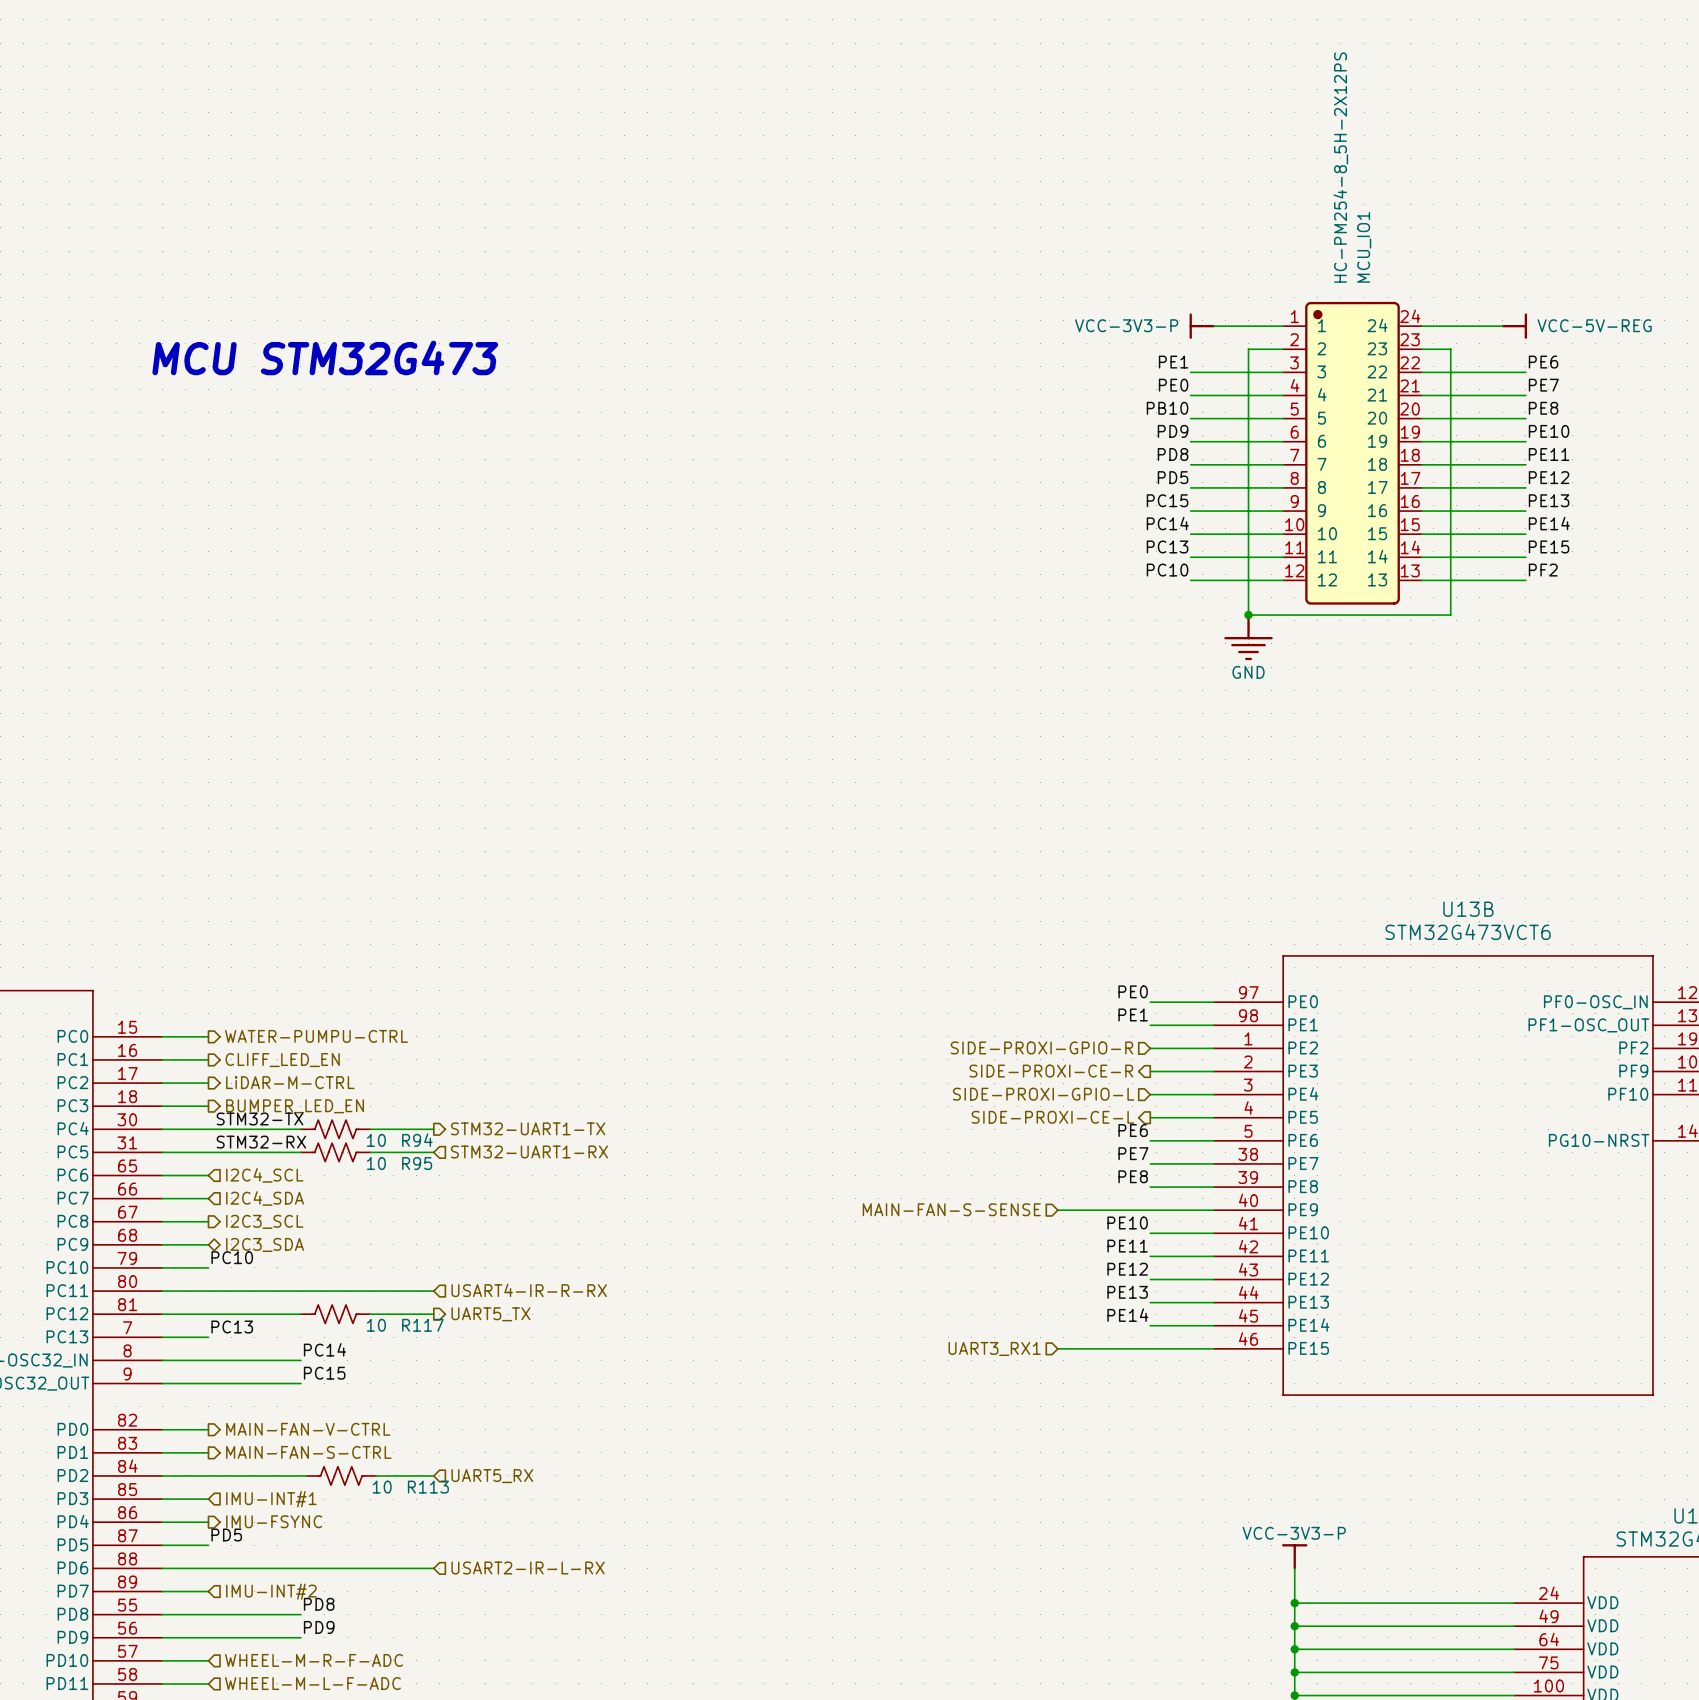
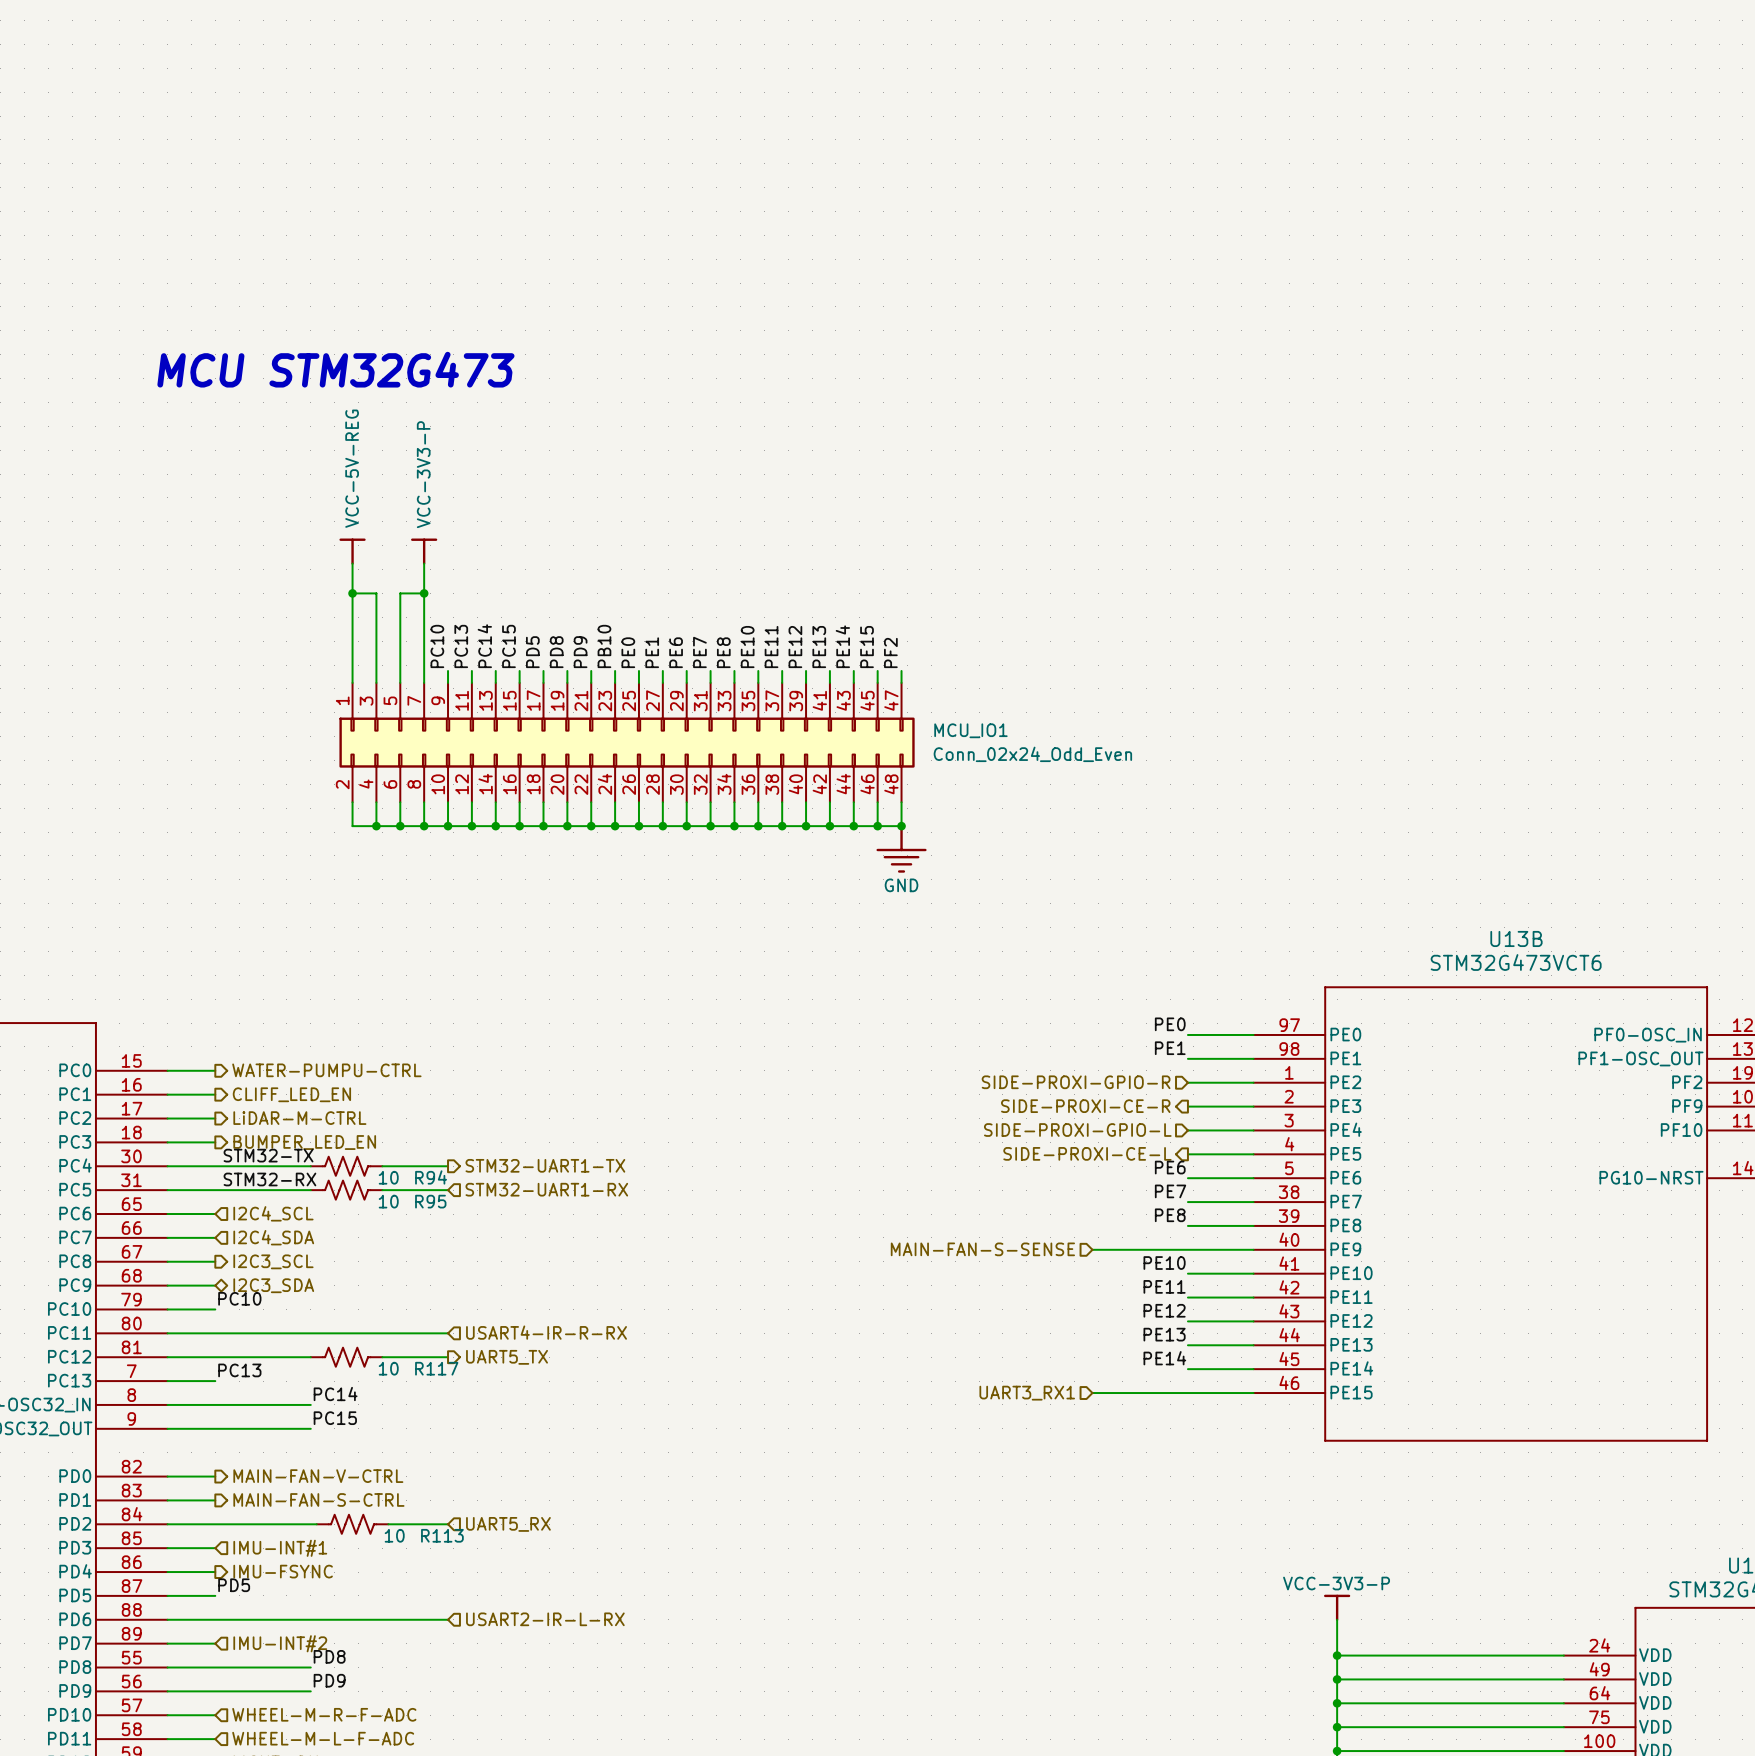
MCU_IO1 value: HC-PM254-8_5H-2X12PS (1340, 167) -> Conn_02x24_Odd_Even (1032, 754)
MCU_IO1 name position: MCU_IO1 (1364, 247) -> MCU_IO1 (970, 730)
MCU_IO1 symbol: [1283, 301, 1422, 605] -> [339, 682, 915, 803]
power symbol: VCC-3V3-P (1202, 326) -> none
wire: (1213, 326) (1283, 326) -> none
wire: (1421, 326) (1502, 326) -> none
power symbol: VCC-5V-REG (1514, 326) -> none
wire: (1283, 349) (1248, 349) (1248, 615) (1450, 615) (1450, 349) (1421, 349) -> none
label: PE1 (1173, 362) -> none
label: PE6 (1543, 362) -> none
wire: (1190, 372) (1283, 372) -> none
wire: (1421, 372) (1525, 372) -> none
label: PE0 (1173, 385) -> none
label: PE7 (1543, 385) -> none
wire: (1190, 395) (1283, 395) -> none
wire: (1421, 395) (1525, 395) -> none
label: PB10 (1167, 408) -> none
label: PE8 (1543, 408) -> none
wire: (1190, 418) (1283, 418) -> none
wire: (1421, 418) (1525, 418) -> none
label: PD9 (1173, 431) -> none
label: PE10 (1549, 431) -> none
wire: (1190, 441) (1283, 441) -> none
wire: (1421, 441) (1525, 441) -> none
label: PD8 (1173, 454) -> none
label: PE11 (1549, 454) -> none
wire: (1190, 464) (1283, 464) -> none
wire: (1421, 464) (1525, 464) -> none
label: PD5 (1173, 477) -> none
label: PE12 (1549, 477) -> none
wire: (1190, 487) (1283, 487) -> none
wire: (1421, 487) (1525, 487) -> none
label: PC15 (1167, 500) -> none
label: PE13 (1549, 500) -> none
wire: (1190, 511) (1283, 511) -> none
wire: (1421, 511) (1525, 511) -> none
label: PC14 (1167, 523) -> none
label: PE14 (1549, 523) -> none
power symbol: none -> VCC-5V-REG (352, 551)
power symbol: none -> VCC-3V3-P (424, 551)
wire: (1190, 534) (1283, 534) -> none
wire: (1421, 534) (1525, 534) -> none
wire: none -> (352, 563) (352, 682)
wire: none -> (424, 563) (424, 682)
label: PC13 (1167, 546) -> none
label: PE15 (1549, 546) -> none
wire: (1190, 557) (1283, 557) -> none
wire: (1421, 557) (1525, 557) -> none
label: PC10 (1167, 570) -> none
label: PF2 (1543, 570) -> none
wire: none -> (352, 593) (376, 593) (376, 682)
junction: none -> (352, 593)
wire: none -> (424, 593) (400, 593) (400, 682)
junction: none -> (424, 593)
wire: (1190, 580) (1283, 580) -> none
wire: (1421, 580) (1525, 580) -> none
junction: (1248, 615) -> none
label: none -> PC10 (437, 646)
label: none -> PC13 (461, 646)
label: none -> PC14 (484, 646)
label: none -> PC15 (508, 646)
label: none -> PB10 (604, 646)
label: none -> PE10 (747, 647)
label: none -> PE11 (771, 647)
label: none -> PE12 (795, 647)
label: none -> PE13 (819, 647)
label: none -> PE14 (842, 646)
label: none -> PE15 (867, 647)
label: none -> PD5 (532, 652)
label: none -> PD8 (556, 652)
label: none -> PD9 (580, 652)
label: none -> PE7 (699, 652)
label: none -> PE0 (628, 652)
label: none -> PE1 (652, 652)
label: none -> PE6 (676, 652)
label: none -> PE8 (723, 652)
label: none -> PF2 (890, 653)
power symbol: GND (1248, 637) -> none
wire: none -> (448, 670) (448, 682)
wire: none -> (471, 670) (471, 682)
wire: none -> (495, 670) (495, 682)
wire: none -> (519, 670) (519, 682)
wire: none -> (543, 670) (543, 682)
wire: none -> (567, 670) (567, 682)
wire: none -> (591, 670) (591, 682)
wire: none -> (615, 670) (615, 682)
wire: none -> (638, 670) (638, 682)
wire: none -> (662, 670) (662, 682)
wire: none -> (686, 670) (686, 682)
wire: none -> (710, 670) (710, 682)
wire: none -> (734, 670) (734, 682)
wire: none -> (758, 670) (758, 682)
wire: none -> (782, 670) (782, 682)
wire: none -> (806, 670) (806, 682)
wire: none -> (829, 670) (829, 682)
wire: none -> (853, 670) (853, 682)
wire: none -> (877, 670) (877, 682)
wire: none -> (901, 670) (901, 682)
wire: none -> (352, 802) (352, 826) (901, 826) (901, 802)
wire: none -> (376, 802) (376, 826)
wire: none -> (400, 802) (400, 826)
wire: none -> (424, 802) (424, 826)
wire: none -> (448, 802) (448, 826)
wire: none -> (471, 802) (471, 826)
wire: none -> (495, 802) (495, 826)
wire: none -> (519, 802) (519, 826)
wire: none -> (543, 802) (543, 826)
wire: none -> (567, 802) (567, 826)
wire: none -> (591, 802) (591, 826)
wire: none -> (615, 802) (615, 826)
wire: none -> (638, 802) (638, 826)
wire: none -> (662, 802) (662, 826)
wire: none -> (686, 802) (686, 826)
wire: none -> (710, 802) (710, 826)
wire: none -> (734, 802) (734, 826)
wire: none -> (758, 802) (758, 826)
wire: none -> (782, 802) (782, 826)
wire: none -> (806, 802) (806, 826)
wire: none -> (829, 802) (829, 826)
wire: none -> (853, 802) (853, 826)
wire: none -> (877, 802) (877, 826)
junction: none -> (376, 826)
junction: none -> (400, 826)
junction: none -> (424, 826)
junction: none -> (448, 826)
junction: none -> (471, 826)
junction: none -> (495, 826)
junction: none -> (519, 826)
junction: none -> (543, 826)
junction: none -> (567, 826)
junction: none -> (591, 826)
junction: none -> (615, 826)
junction: none -> (638, 826)
junction: none -> (662, 826)
junction: none -> (686, 826)
junction: none -> (710, 826)
junction: none -> (734, 826)
junction: none -> (758, 826)
junction: none -> (782, 826)
junction: none -> (806, 826)
junction: none -> (829, 826)
junction: none -> (853, 826)
junction: none -> (877, 826)
junction: none -> (901, 826)
power symbol: none -> GND (901, 848)

